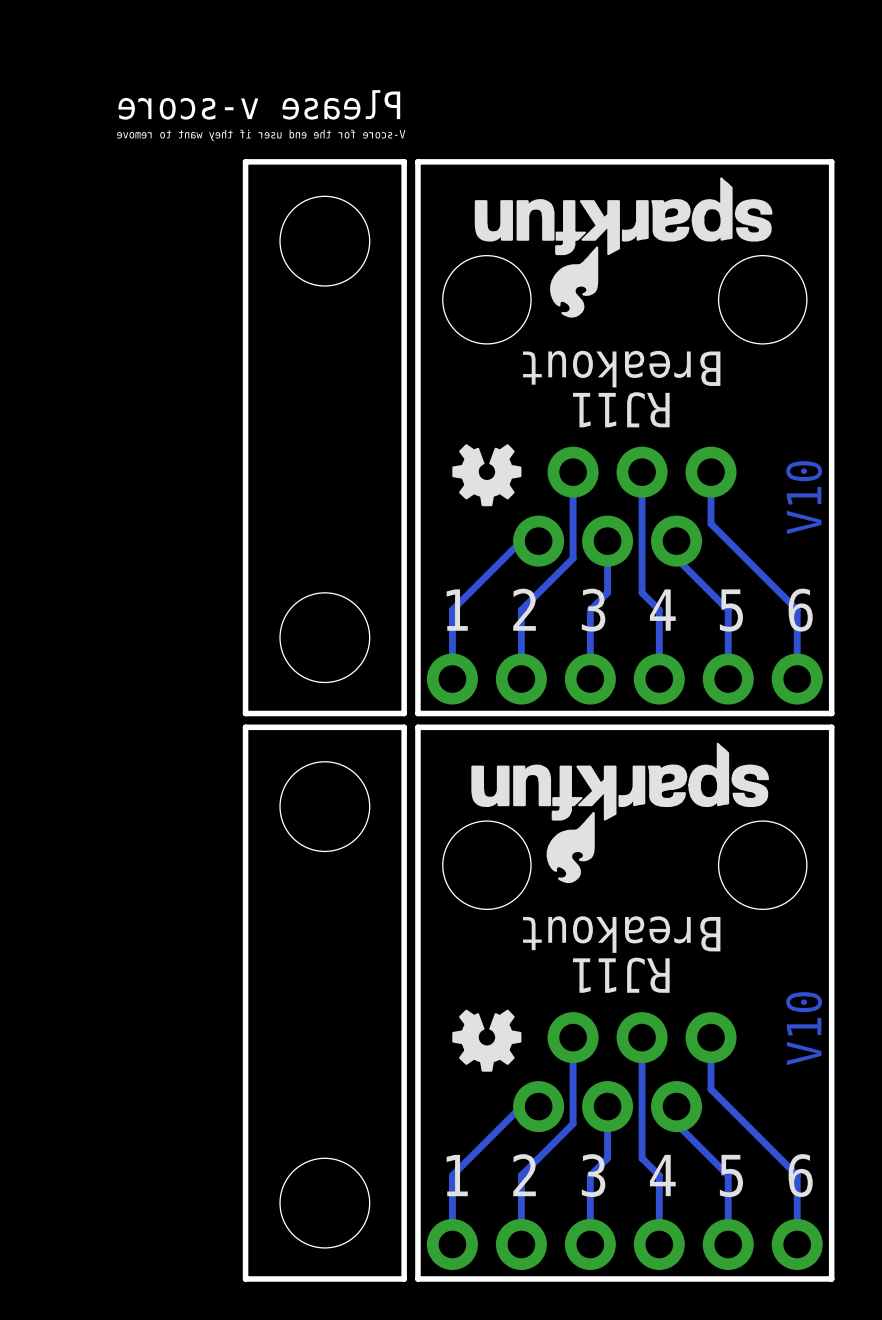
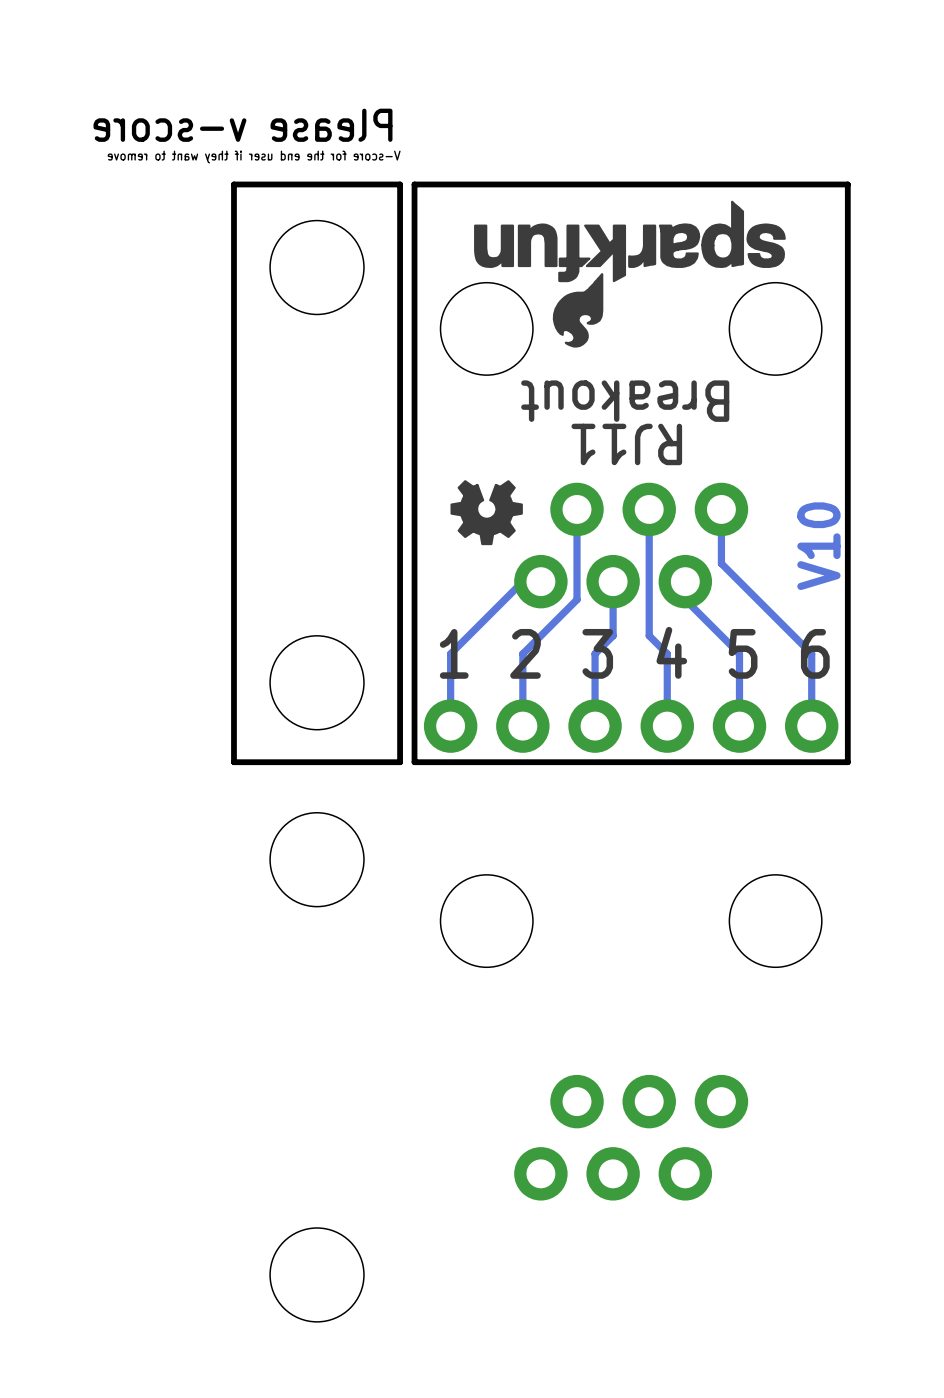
board edge: (404, 727) (245, 727) (245, 1278) (404, 1278) (404, 727) -> none
board edge: (831, 727) (831, 1278) (417, 1278) (417, 727) (831, 727) -> none
drawing: [471, 742, 770, 884] -> none
text: Breakout (621, 934) -> none
text: RJ11 (621, 975) -> none
drawing: [452, 1009, 522, 1072] -> none
text: V10 (804, 1028) -> none
bottom track: (573, 1037) (573, 1123) (521, 1175) (521, 1244) -> none
bottom track: (642, 1037) (642, 1158) (659, 1175) (659, 1244) -> none
bottom track: (711, 1037) (711, 1089) (797, 1175) (797, 1244) -> none
bottom track: (538, 1106) (521, 1106) (452, 1175) (452, 1244) -> none
bottom track: (607, 1106) (607, 1158) (590, 1175) (590, 1244) -> none
bottom track: (676, 1106) (676, 1123) (728, 1175) (728, 1244) -> none
text: 1 (457, 1175) -> none
text: 2 (524, 1175) -> none
text: 3 (593, 1175) -> none
text: 4 (662, 1175) -> none
text: 5 (731, 1175) -> none
text: 6 (800, 1175) -> none
part: (624, 1244) -> none

